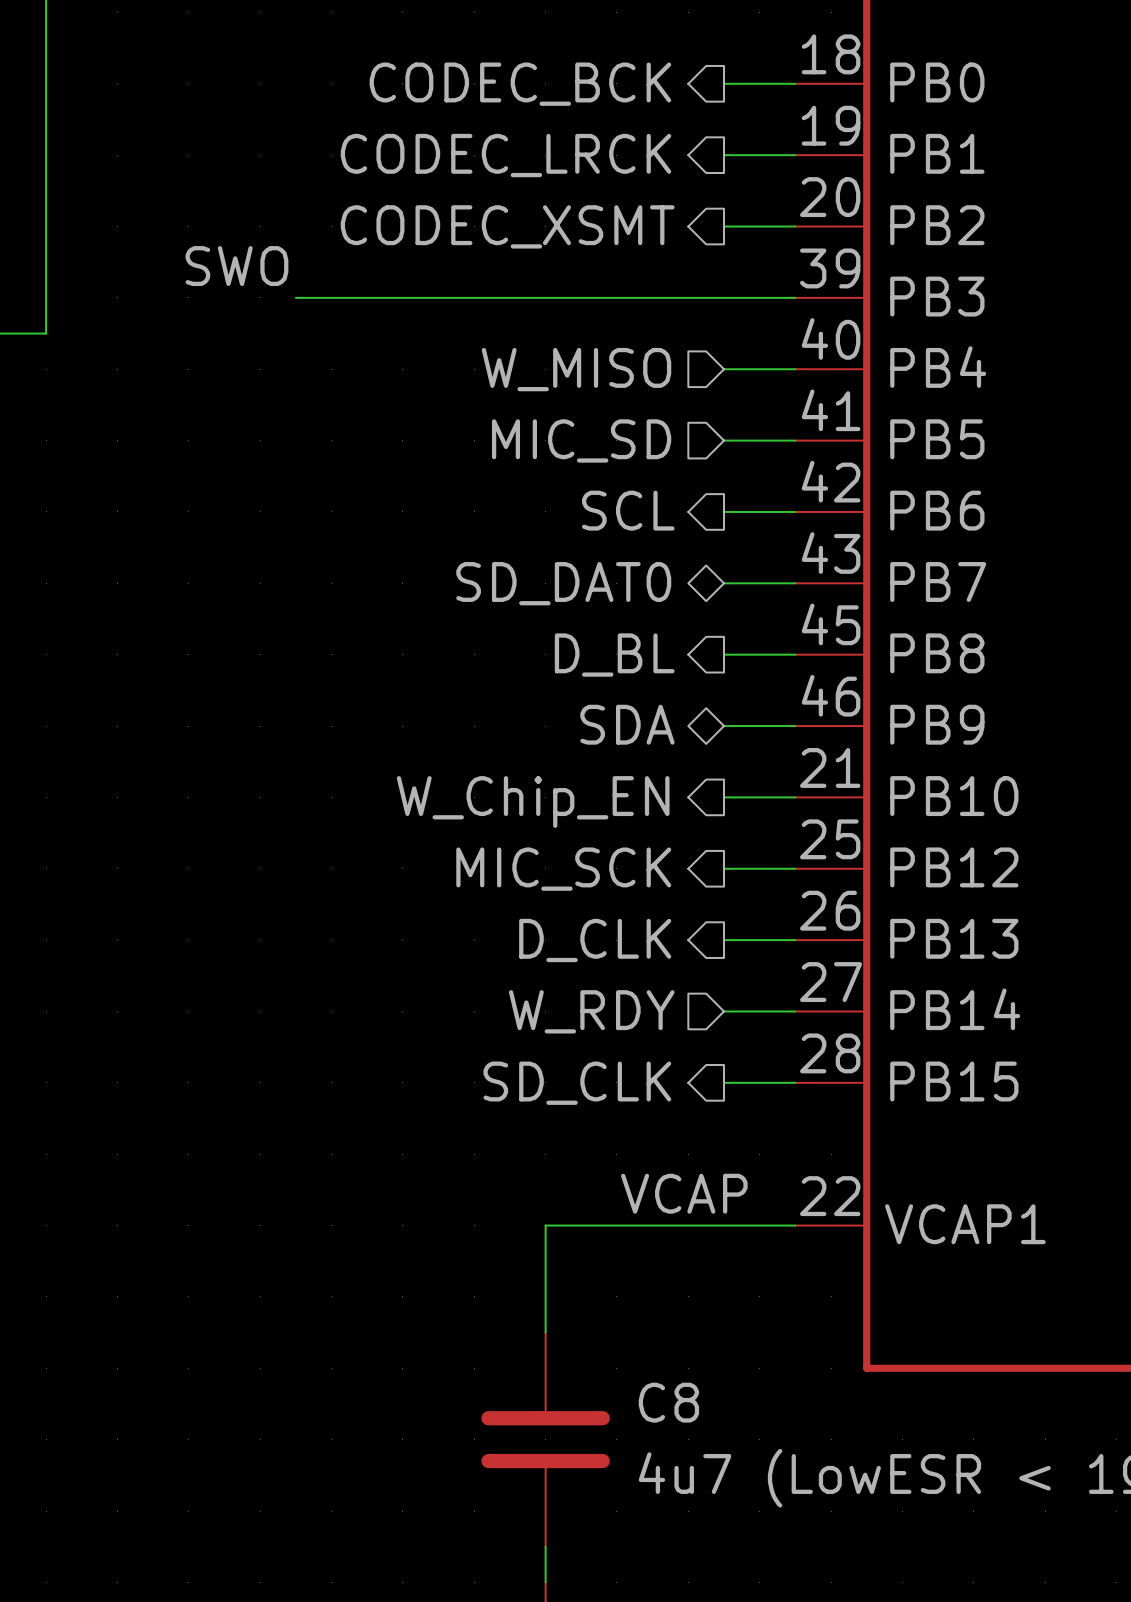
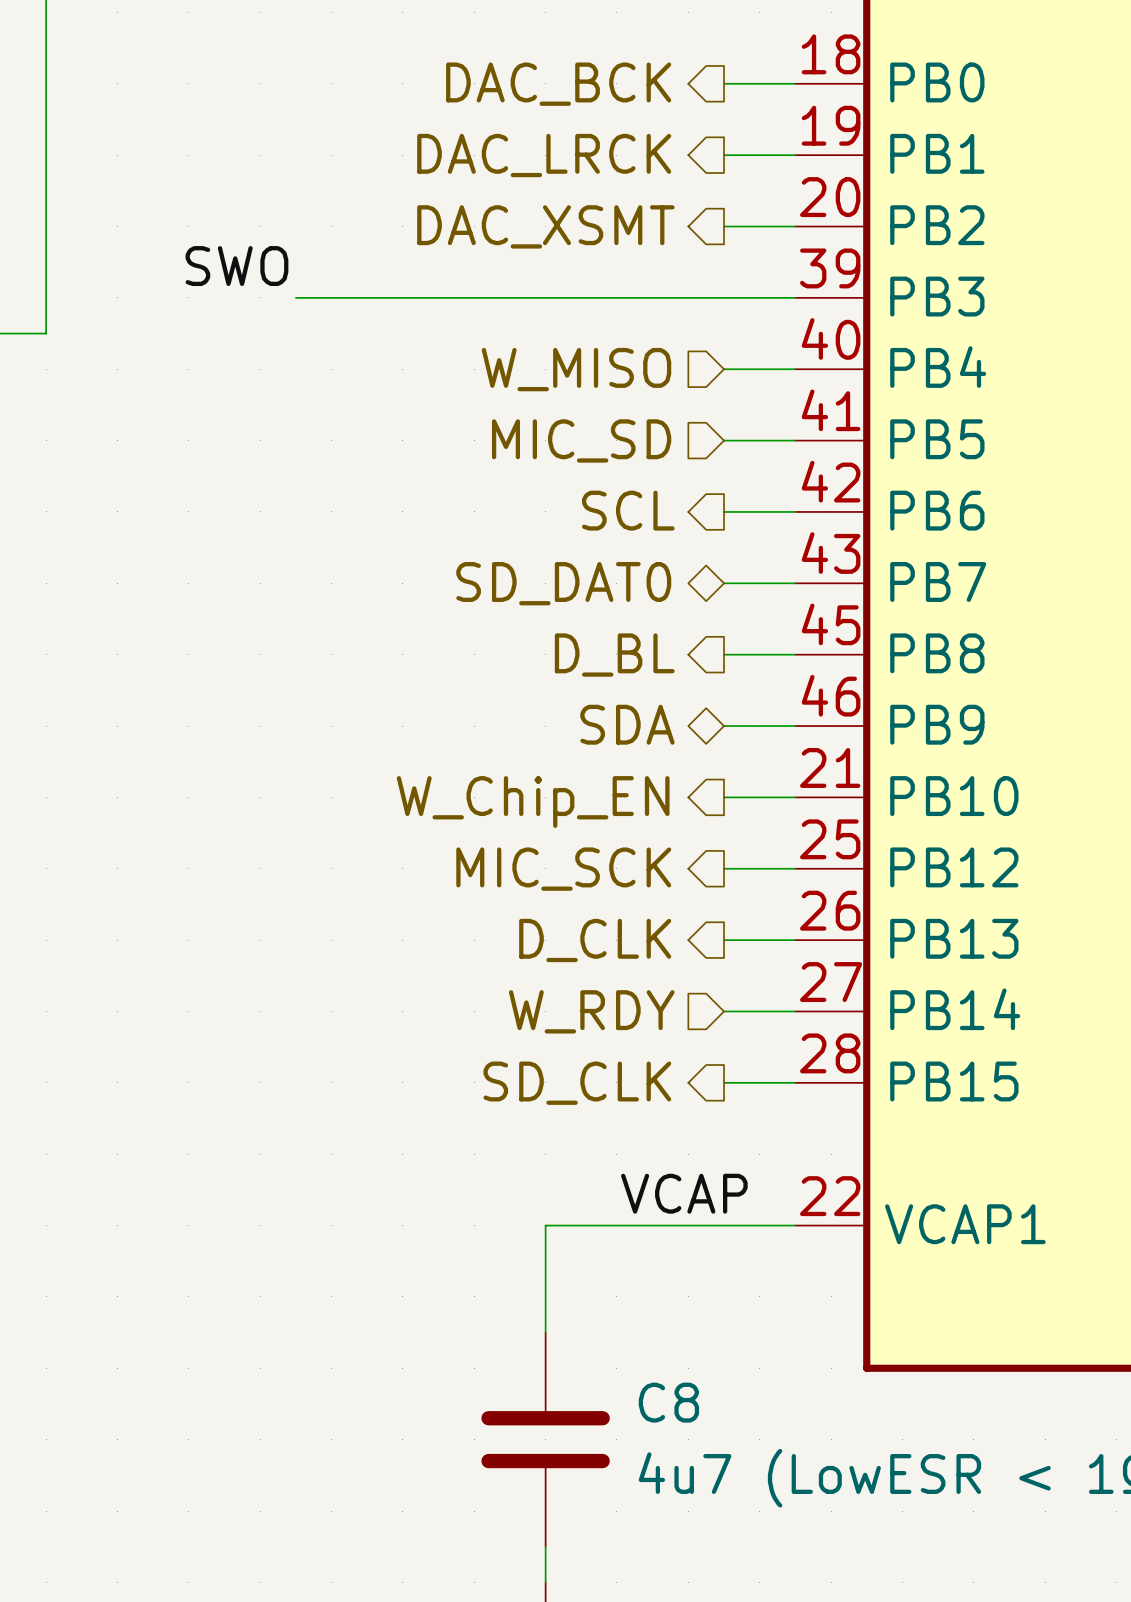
hierarchical label: CODEC_BCK (520, 84) -> DAC_BCK (558, 84)
hierarchical label: CODEC_LRCK (505, 155) -> DAC_LRCK (544, 155)
hierarchical label: CODEC_XSMT (507, 226) -> DAC_XSMT (545, 226)

